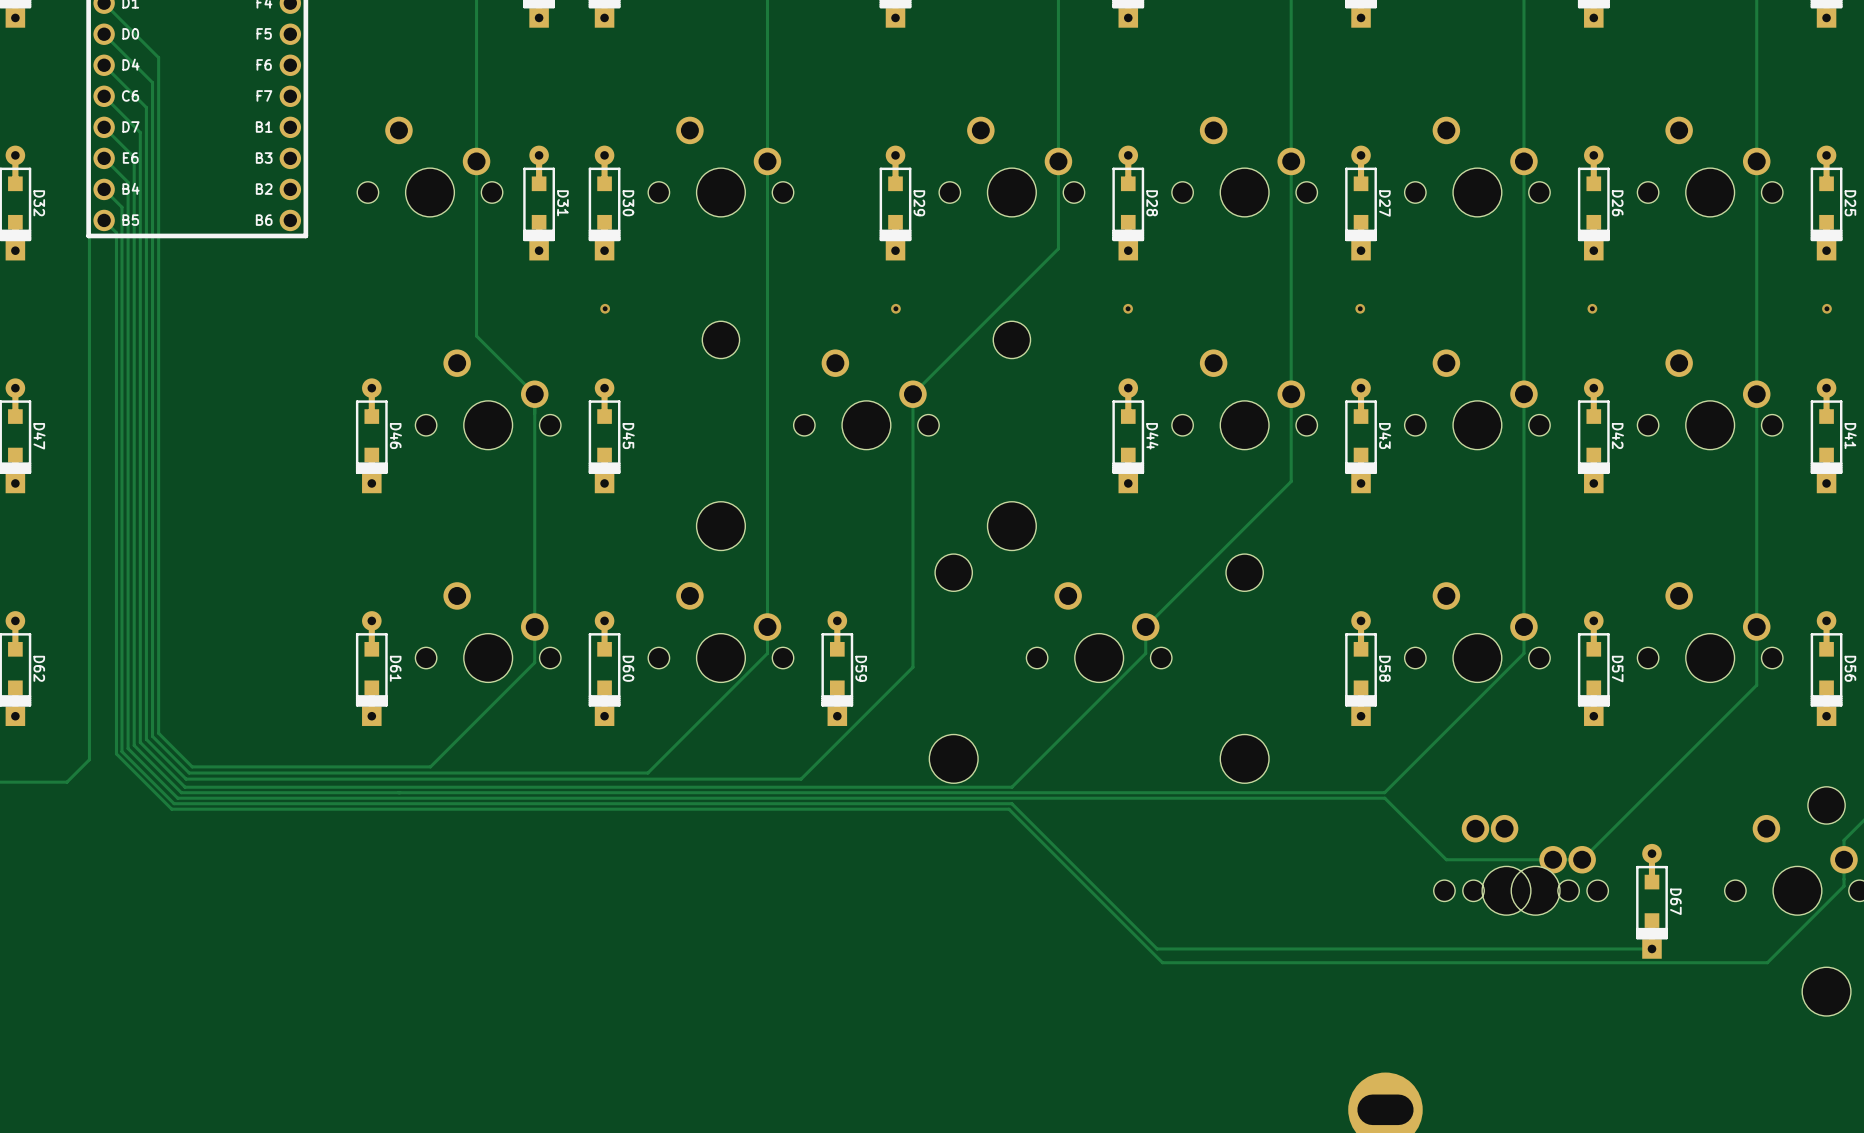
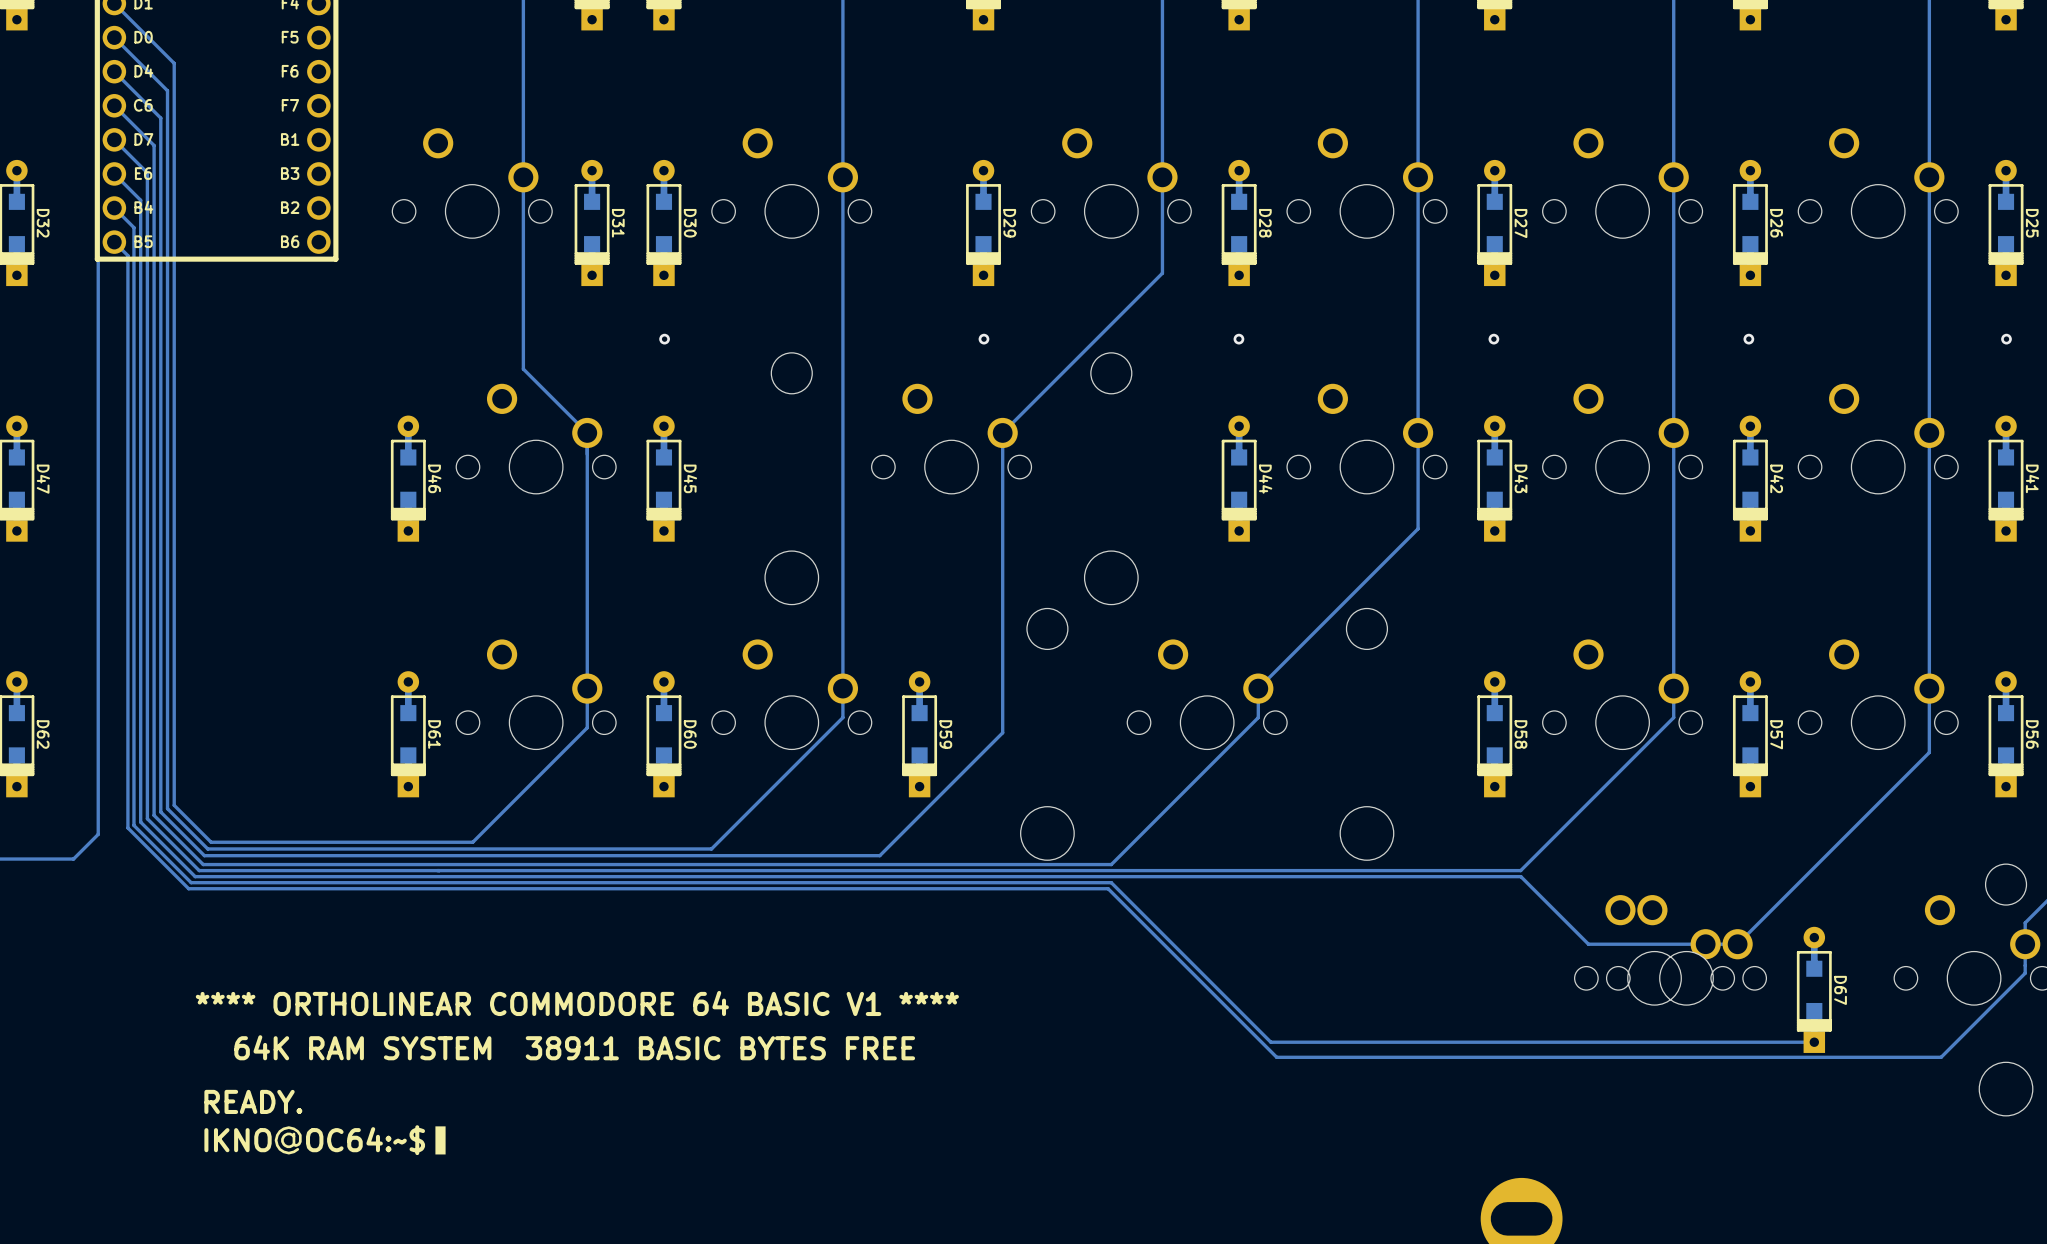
text: none -> **** ORTHOLINEAR COMMODORE 64 BASIC V1 **** (577, 1003)
text: none -> 64K RAM SYSTEM 38911 BASIC BYTES FREE (574, 1047)
text: none -> READY. (253, 1101)
text: none -> @ (288, 1140)
text: none -> IKNO OC64:~$ (314, 1140)
text: none -> ▮ (440, 1140)

